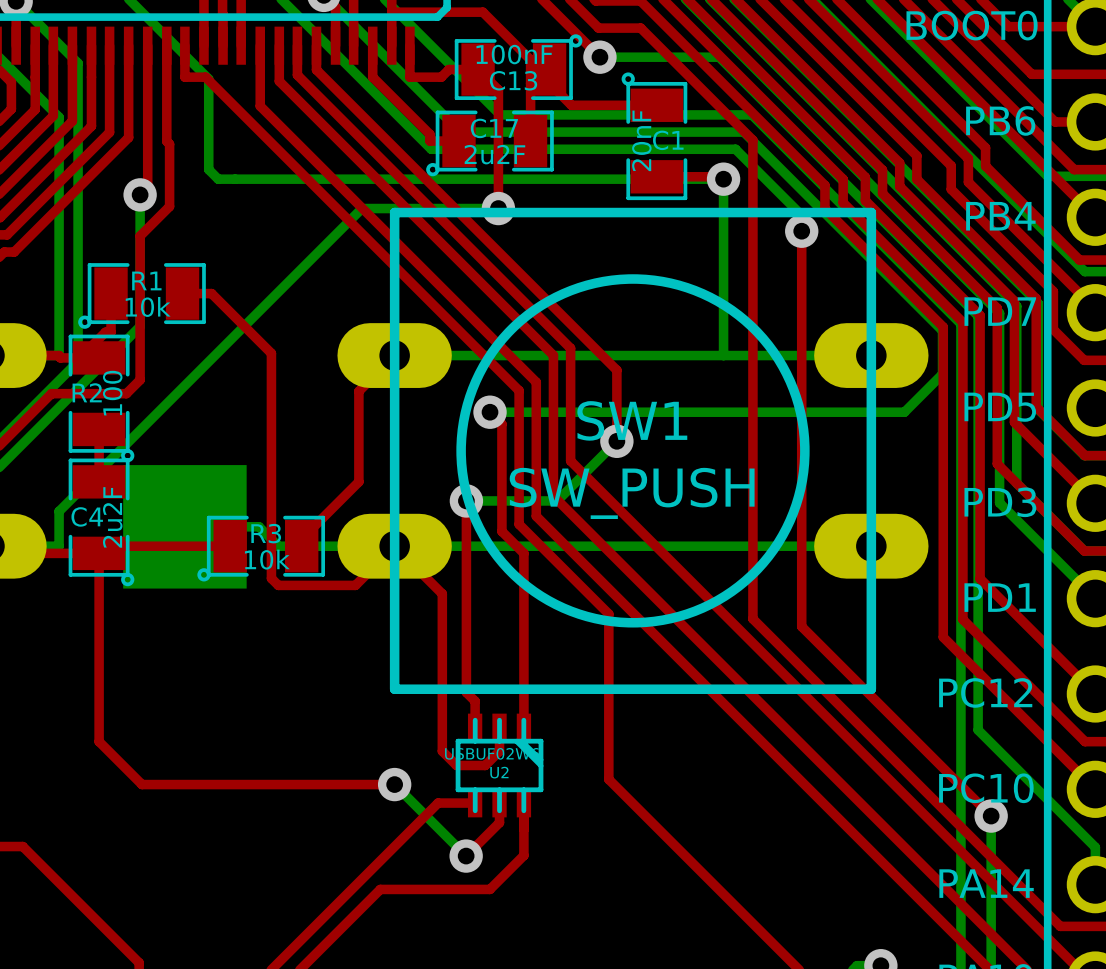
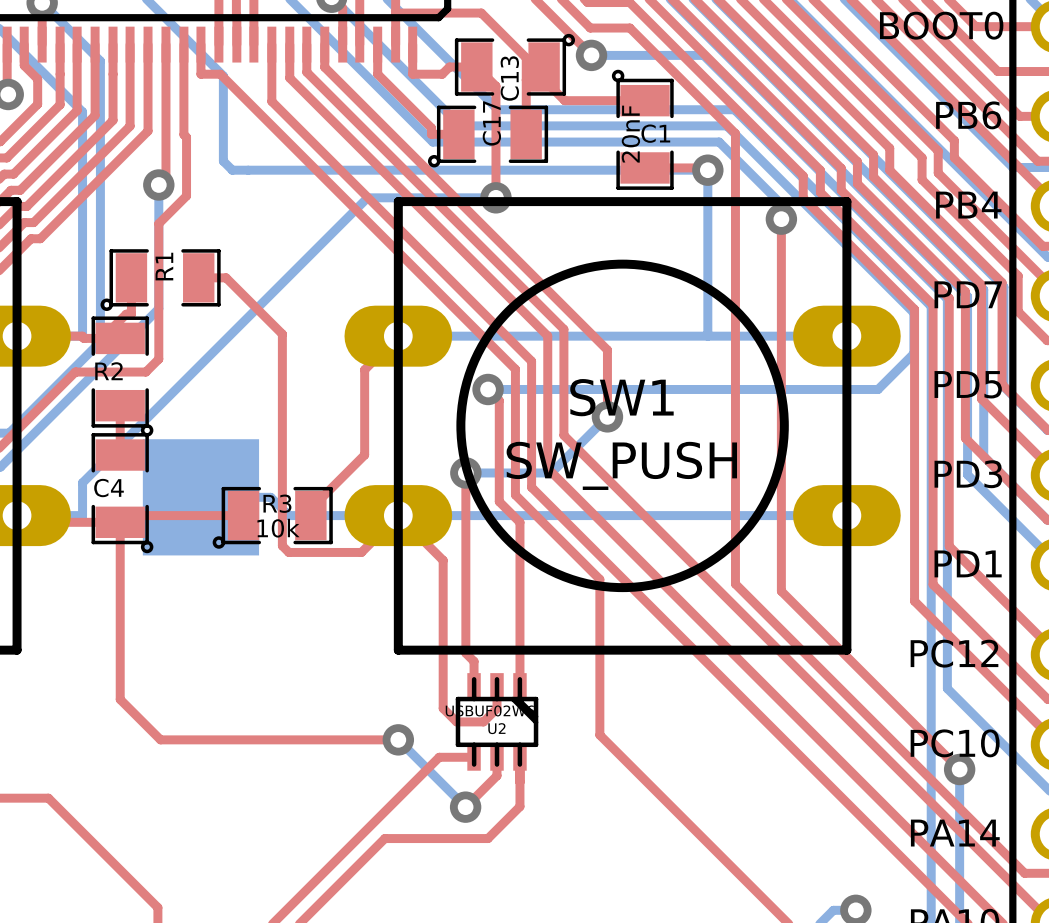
C13 value: 100nF (514, 54) -> none
C13 name rotation: 0° (513, 80) -> 90° counterclockwise (509, 78)
C17 name rotation: 0° (494, 128) -> 90° counterclockwise (491, 123)
C17 value: 2u2F (494, 154) -> none
R1 name rotation: 0° (146, 280) -> 90° counterclockwise (164, 266)
R1 value: 10k (148, 306) -> none
R2 value: 100 (112, 393) -> none
C4 value: 2u2F (112, 517) -> none

